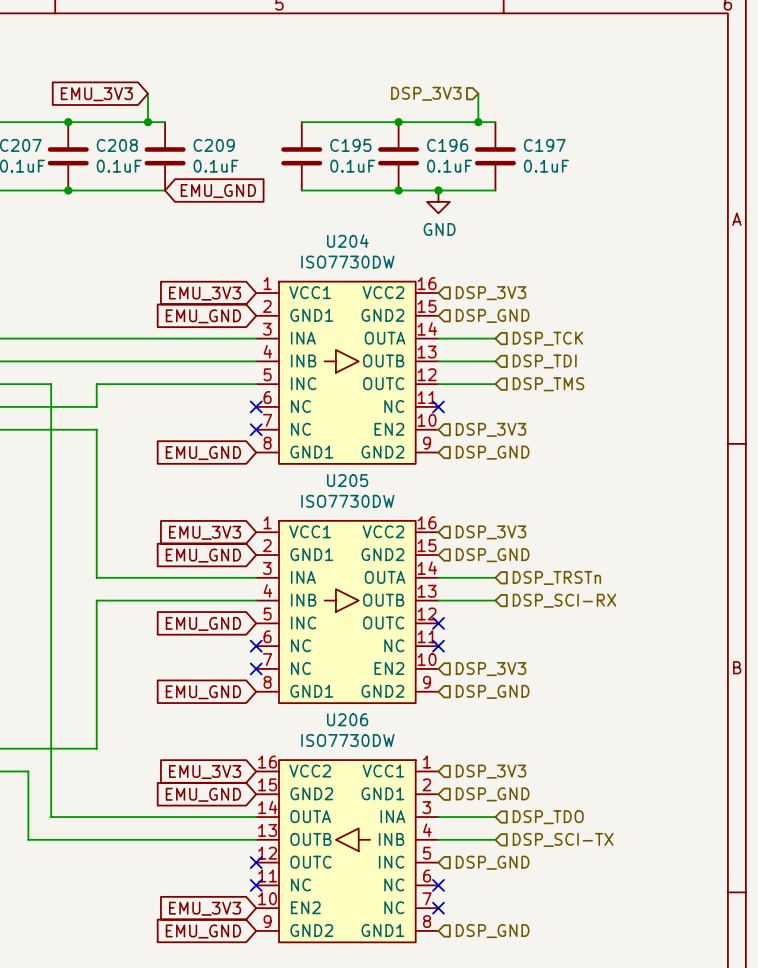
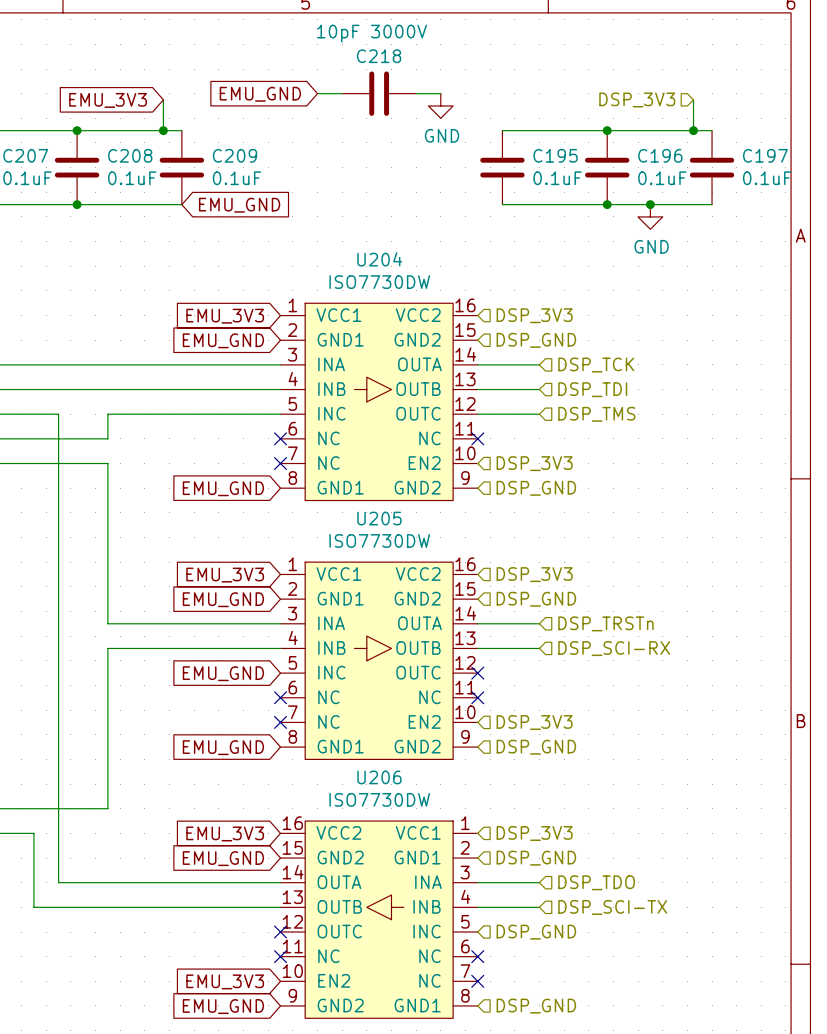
wire: none -> (317, 93) (342, 93)
C218: none -> 10pF 3000V (379, 93)
wire: none -> (416, 93) (440, 93)
global label: none -> EMU_GND (260, 94)
hierarchical label position: DSP_3V3 (426, 93) -> DSP_3V3 (637, 99)
wire: (478, 93) (478, 122) -> (693, 99) (693, 130)
power symbol: none -> GND (440, 105)
wire: (301, 122) (461, 122) -> (539, 130) (712, 130)
junction: (398, 122) -> none
junction: (478, 122) -> none
junction: none -> (607, 130)
junction: none -> (693, 130)
C195 position: (301, 156) -> (502, 167)
C196 position: (398, 156) -> (607, 167)
C197 position: (495, 156) -> (712, 167)
wire: (301, 190) (461, 190) -> (539, 204) (712, 204)
junction: (398, 190) -> none
junction: (438, 190) -> none
junction: none -> (607, 204)
junction: none -> (650, 204)
power symbol: GND (438, 201) -> none
power symbol: none -> GND (650, 216)

